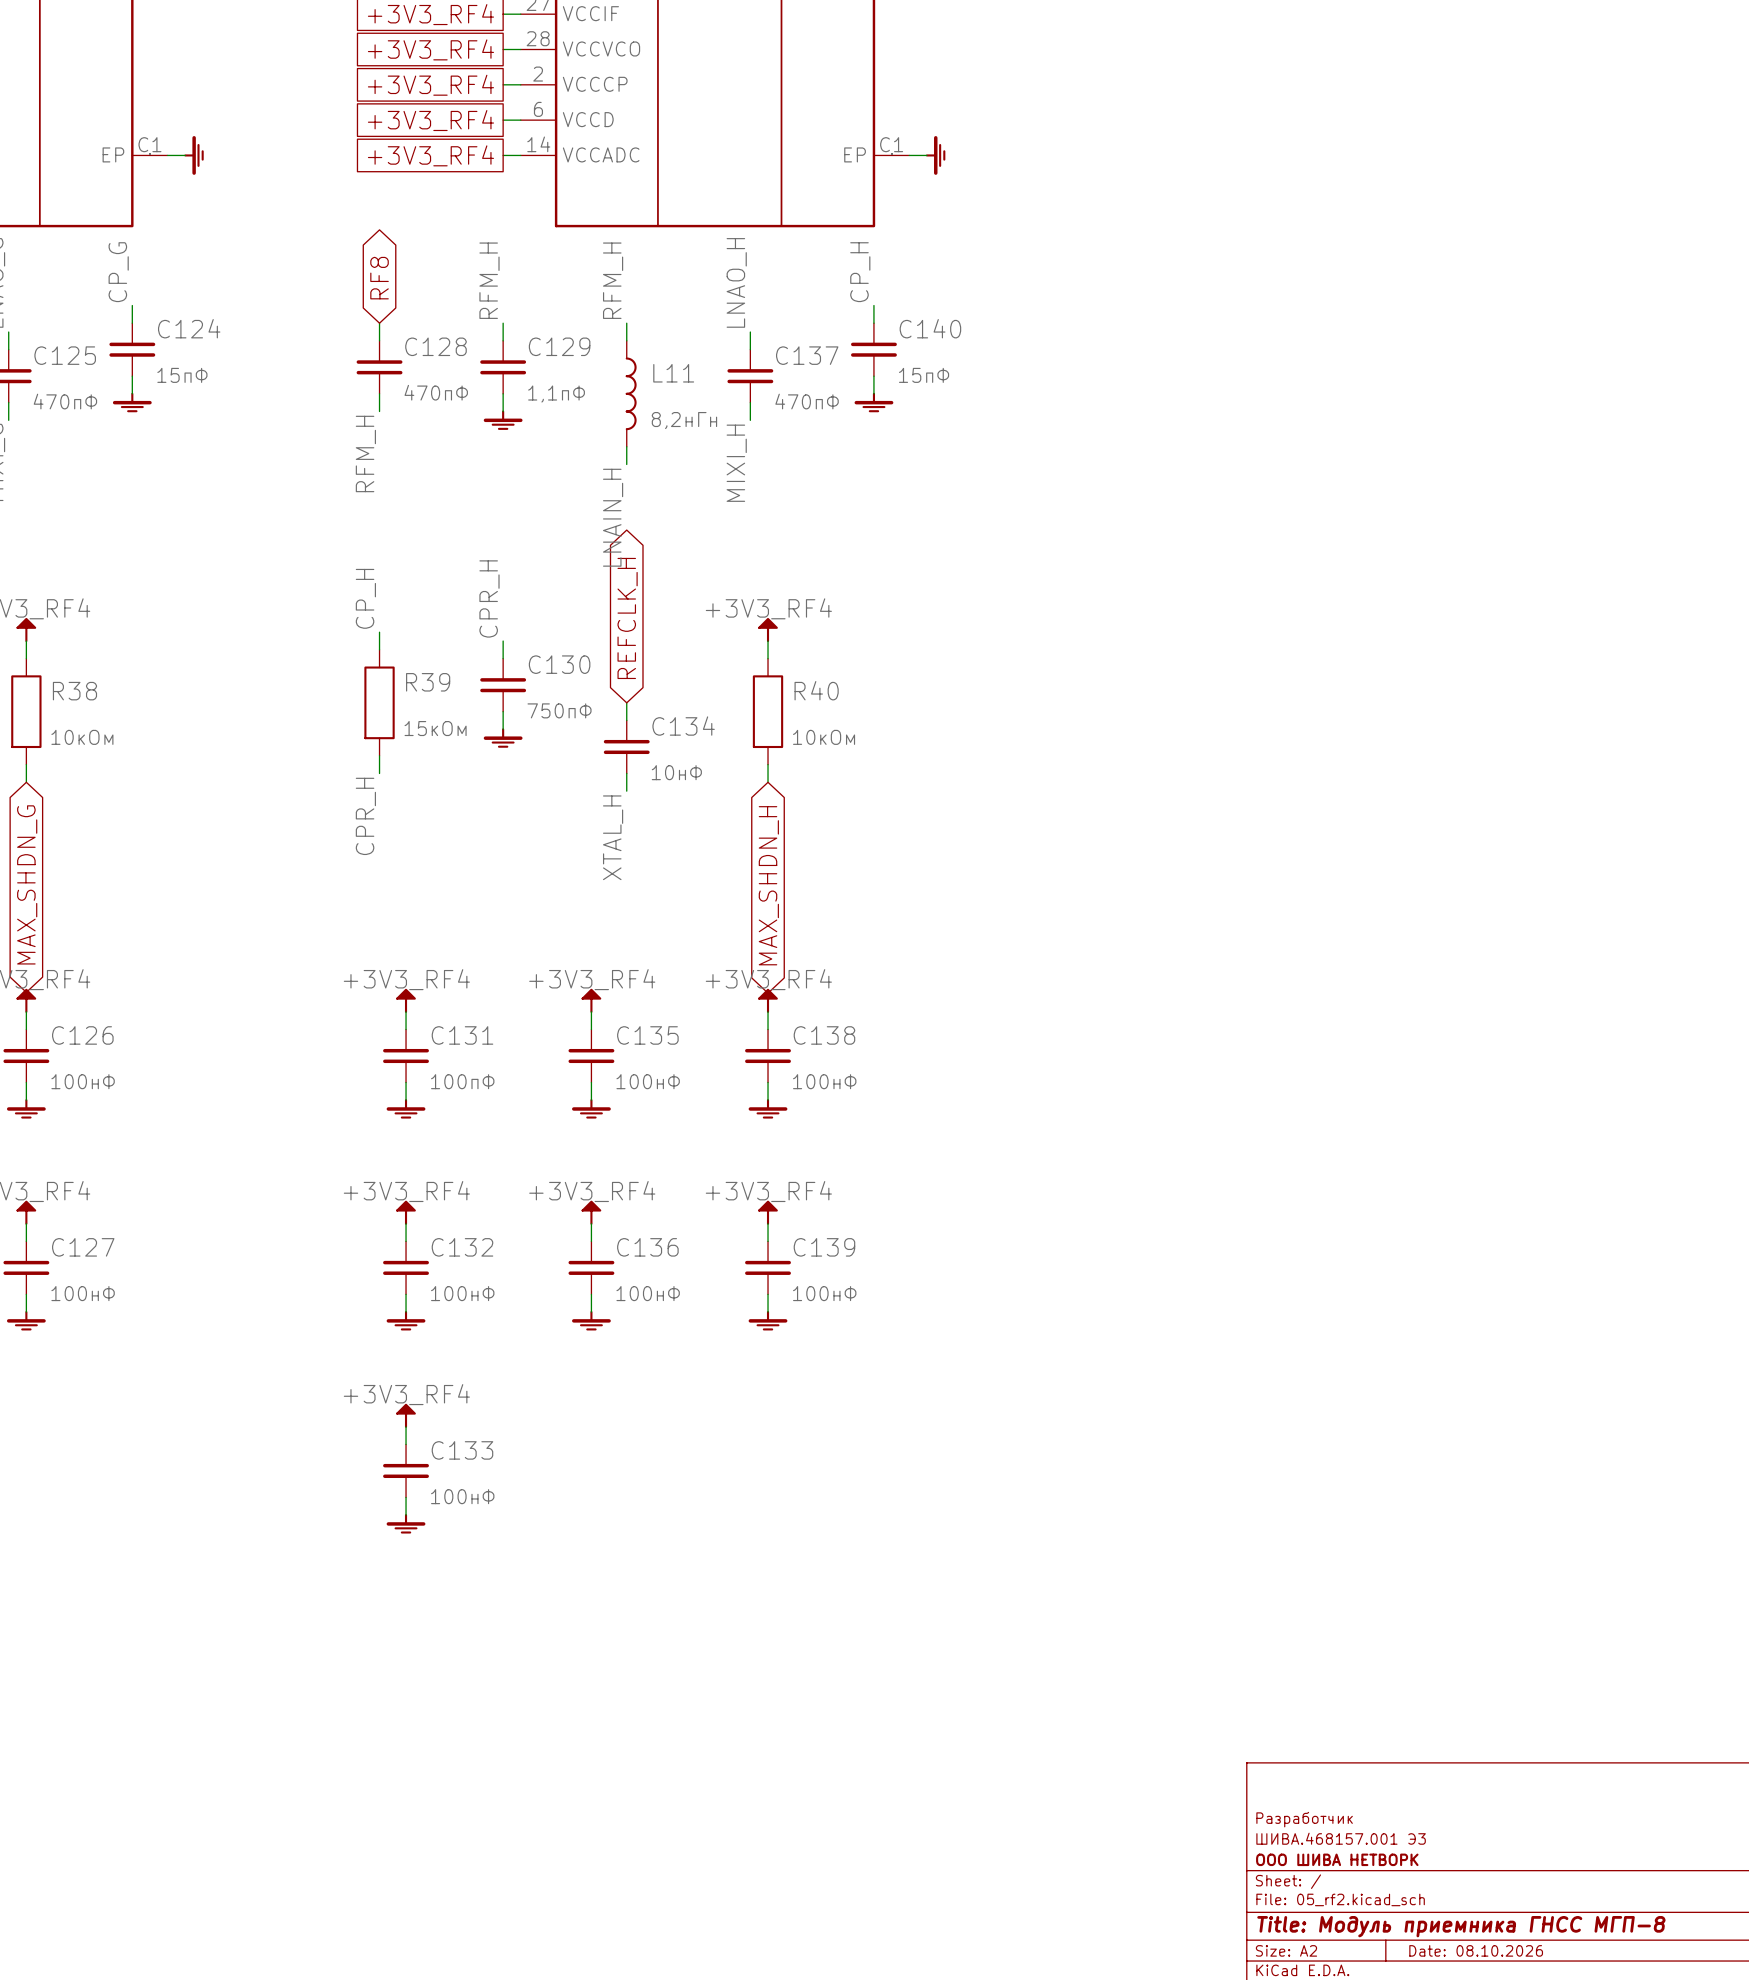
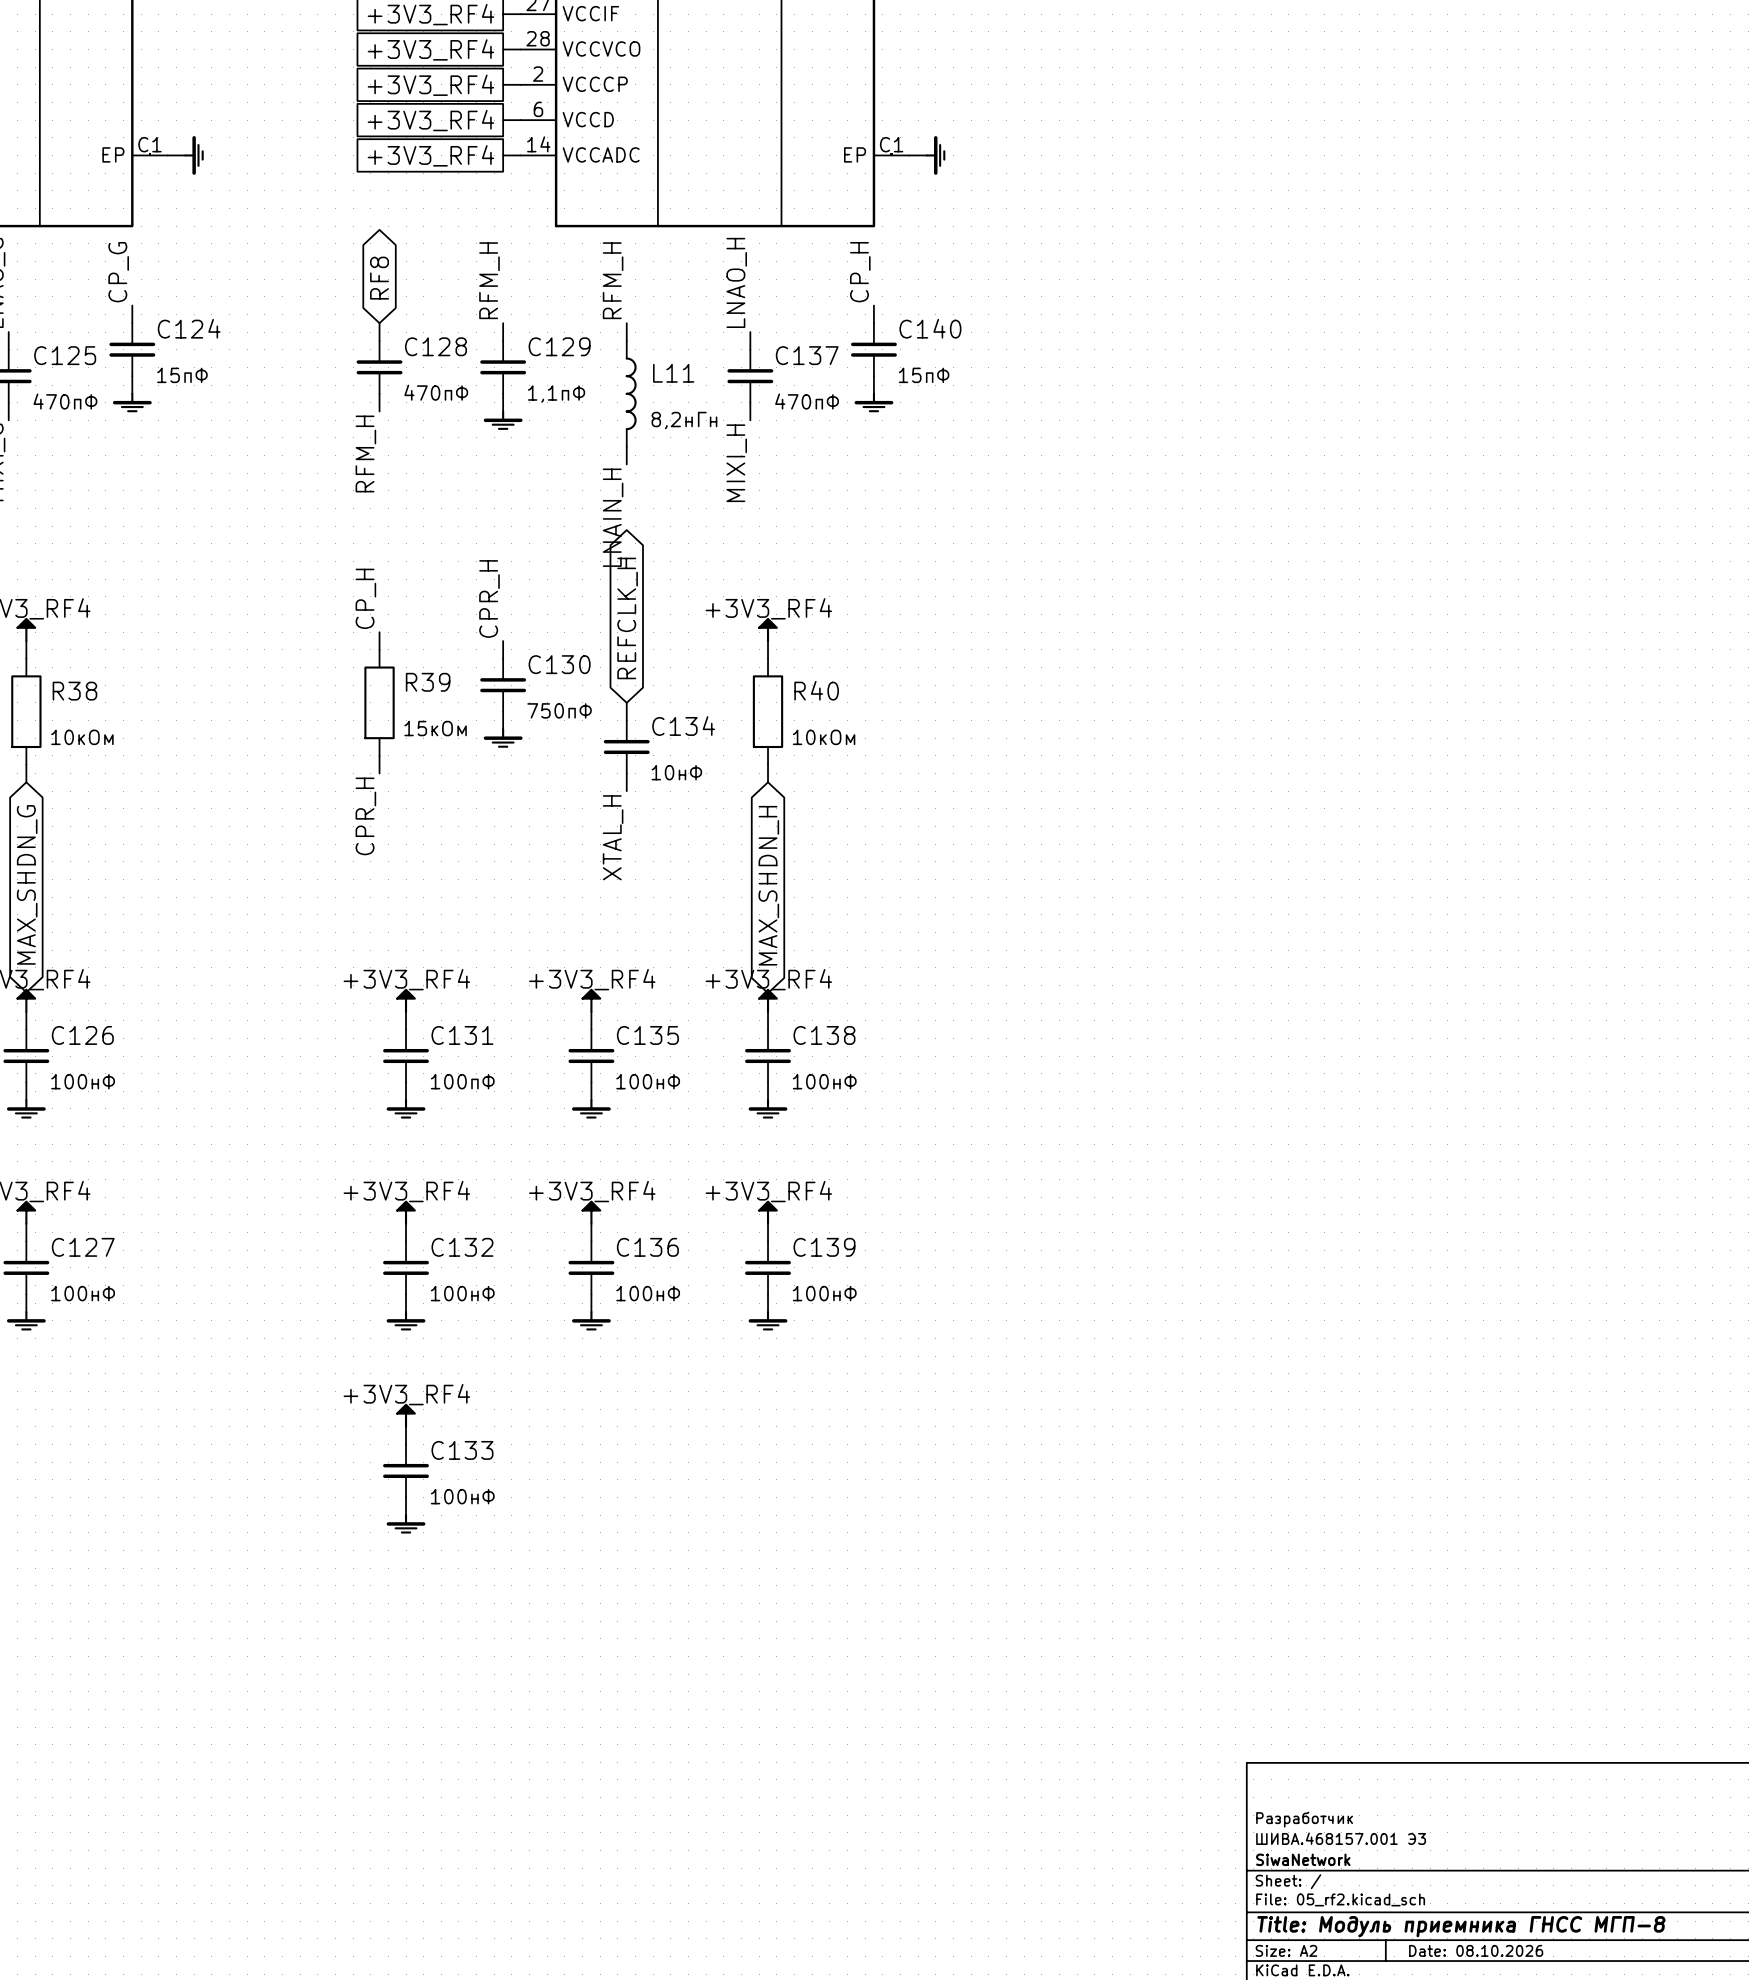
title block: ООО ШИВА НЕТВОРК (1337, 1859) -> SiwaNetwork (1303, 1859)

